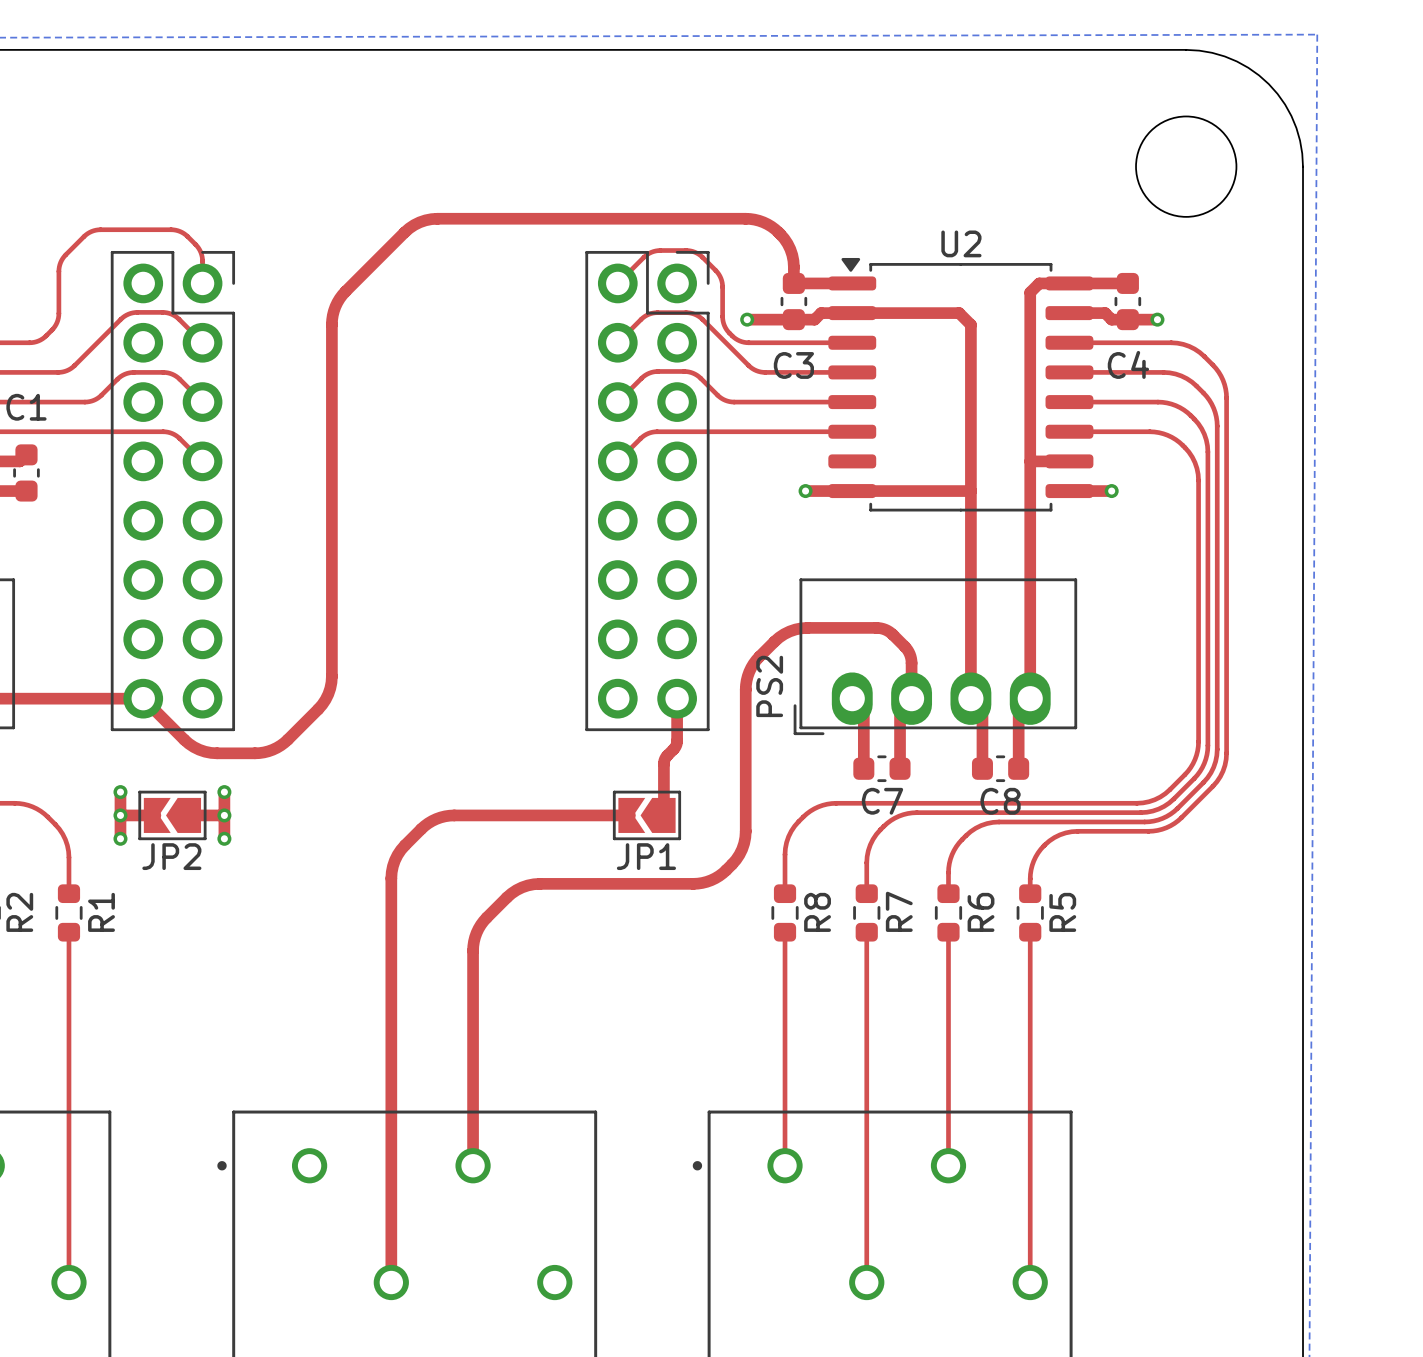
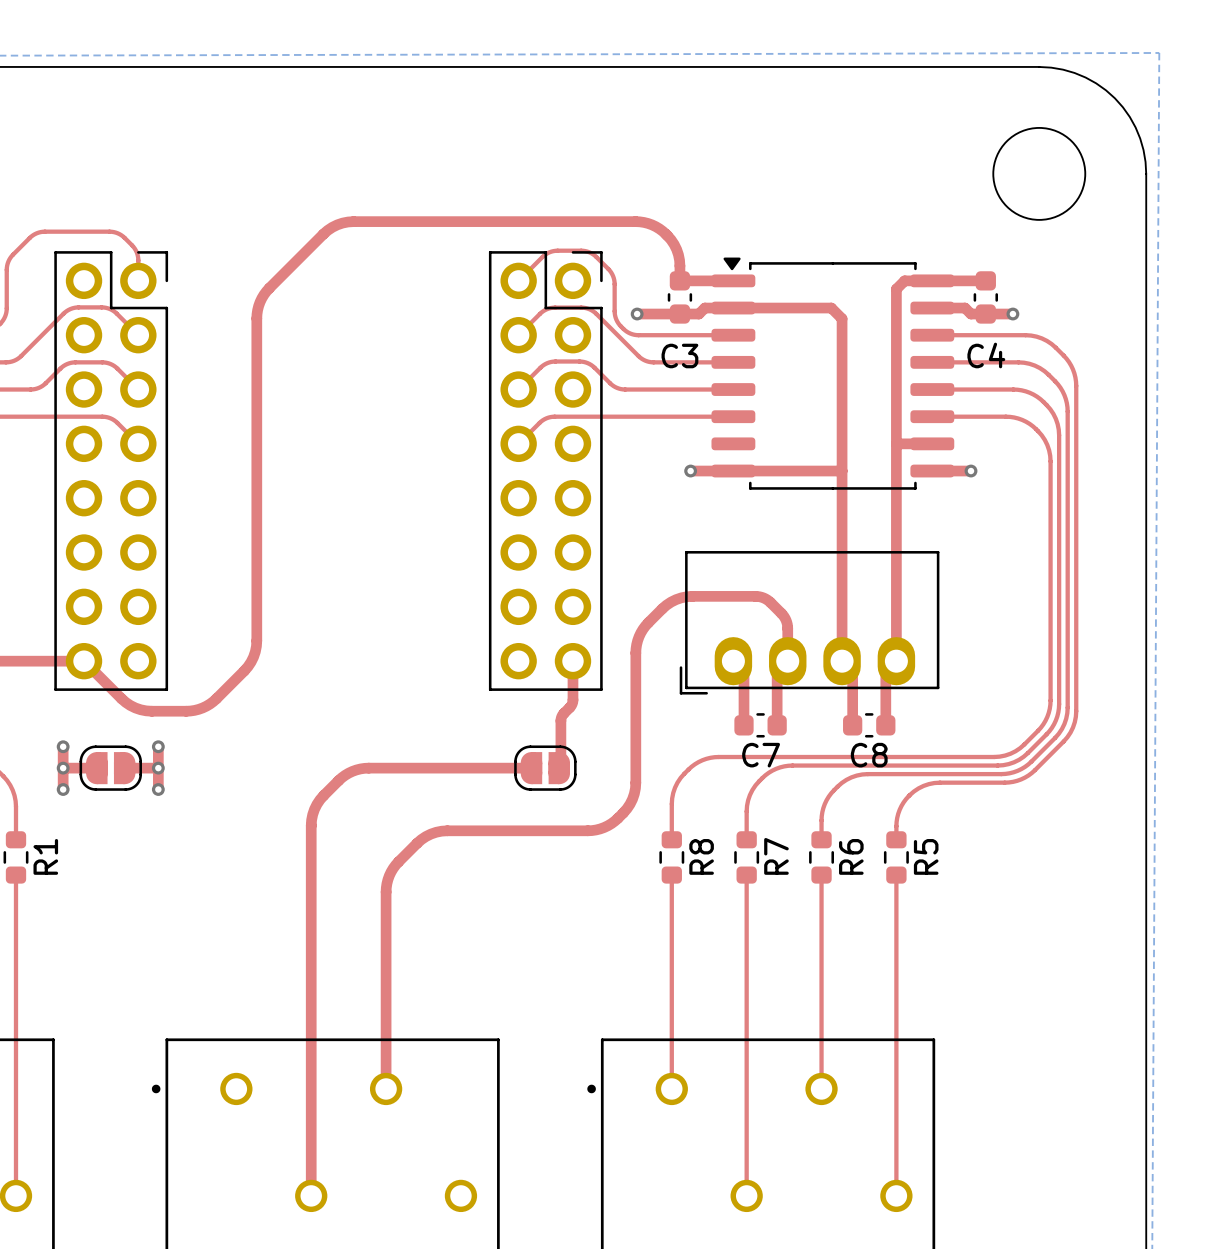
U2 name: U2 (961, 243) -> none
PS2 name: PS2 (769, 686) -> none
JP2: (172, 815) -> none
part: none -> (110, 768)
JP1: (646, 815) -> none
part: none -> (545, 768)

